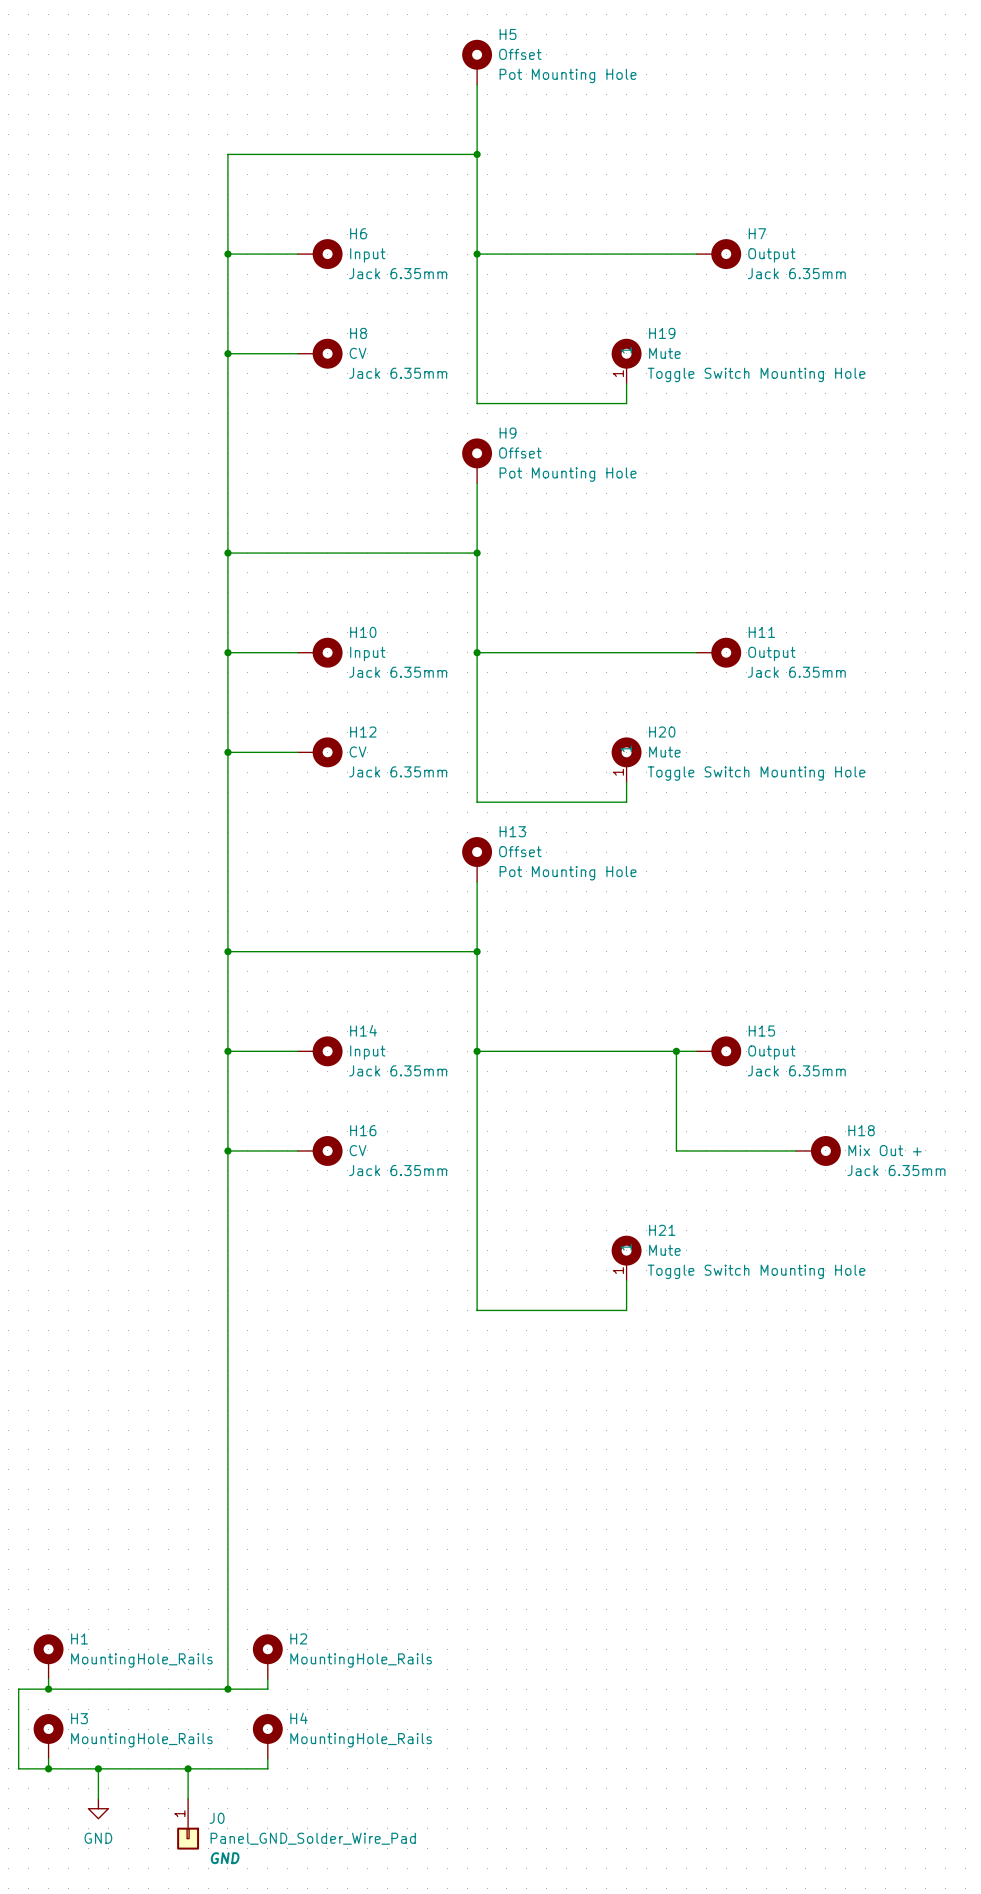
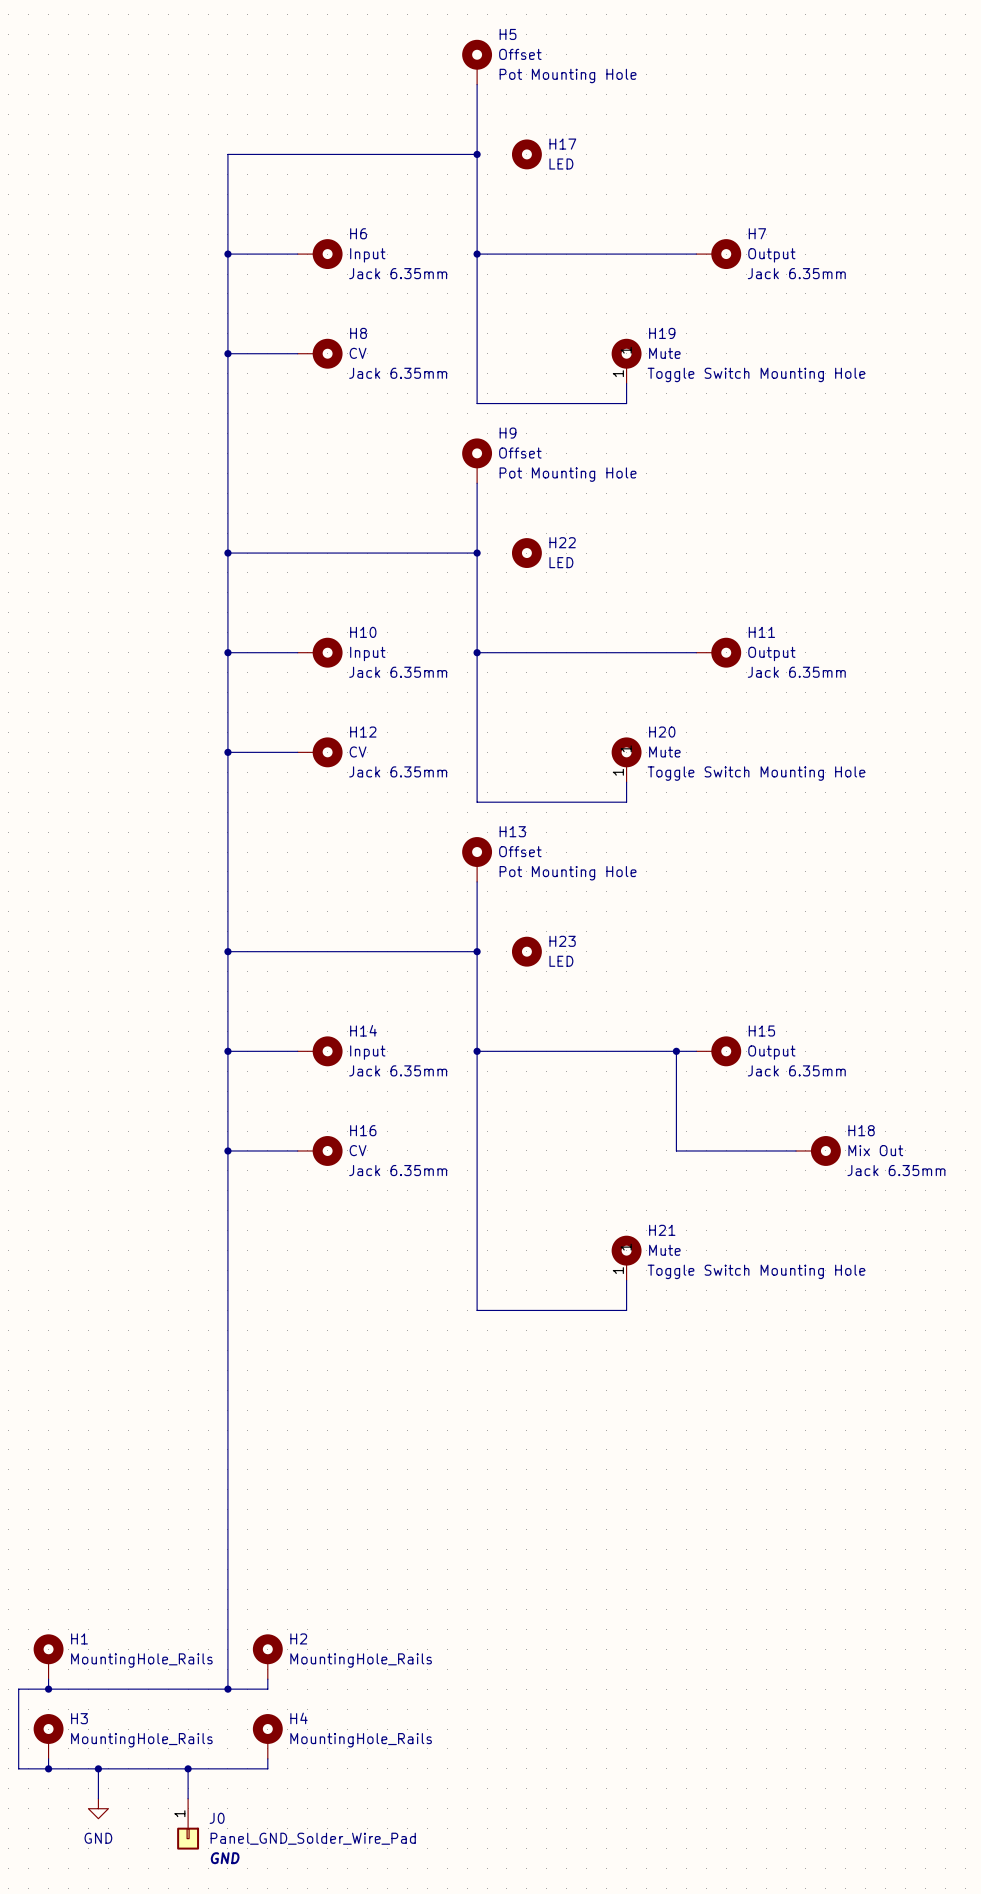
H17: none -> LED (526, 154)
H22: none -> LED (526, 553)
H23: none -> LED (526, 951)
H18 value: Mix Out + (885, 1150) -> Mix Out (875, 1150)

